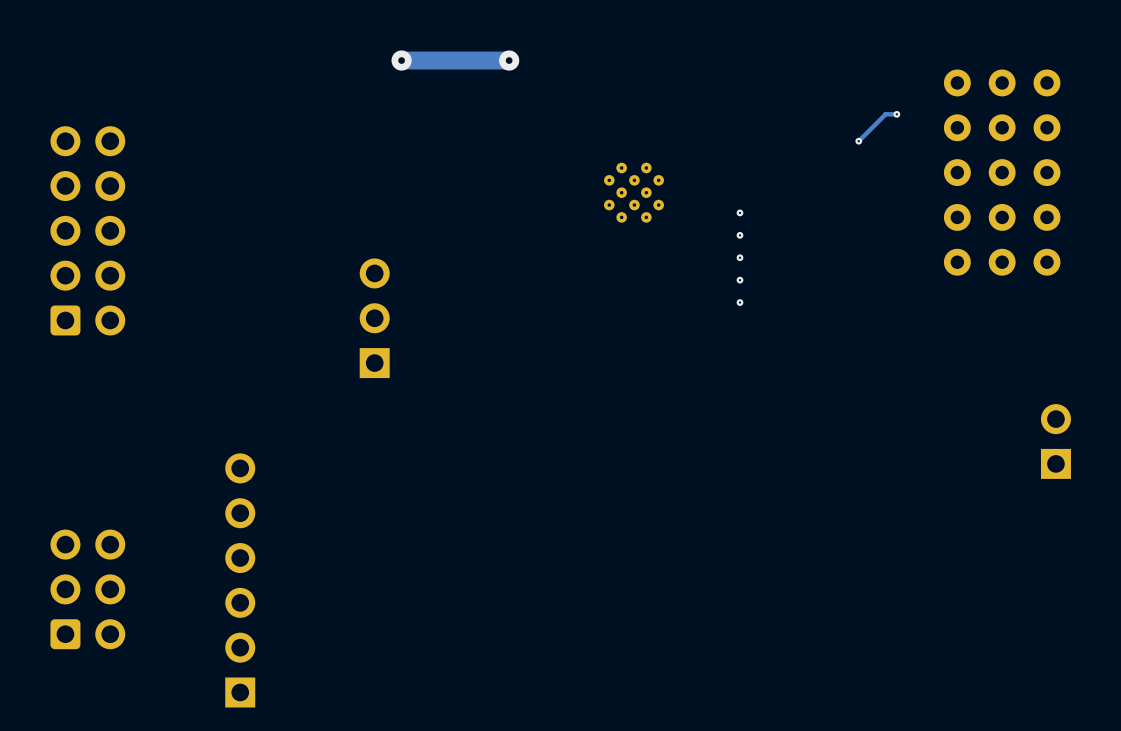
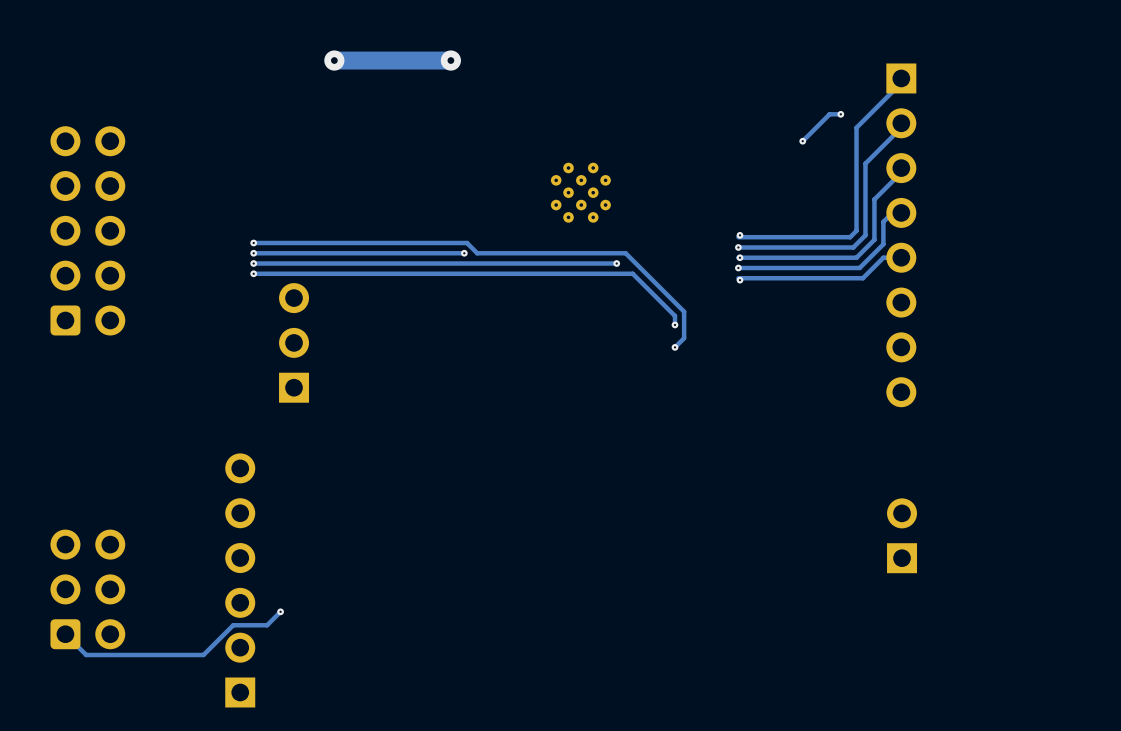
via: none -> (334, 60)
track: none -> (401, 60) (334, 60)
via: (401, 60) -> none
via: none -> (450, 60)
track: (509, 60) (450, 60) -> none
via: (509, 60) -> none
track: none -> (905, 78) (856, 127) (856, 230) (850, 237) (738, 237)
via: none -> (840, 114)
track: (896, 114) (885, 114) (858, 141) -> (840, 114) (829, 114) (802, 141)
via: (896, 114) -> none
track: none -> (905, 123) (865, 163) (865, 235) (853, 247) (738, 247)
via: none -> (802, 141)
via: (858, 141) -> none
track: none -> (905, 168) (874, 199) (874, 239) (856, 257) (738, 257)
part: (1002, 172) -> none
part position: (634, 192) -> (580, 192)
via: (739, 212) -> none
track: none -> (905, 212) (892, 212) (883, 221) (883, 244) (859, 267) (738, 267)
part: none -> (901, 235)
track: none -> (253, 243) (467, 243) (477, 253) (625, 253) (684, 311) (684, 338) (674, 347)
via: none -> (253, 243)
via: none -> (738, 247)
via: none -> (253, 253)
track: none -> (464, 253) (253, 253)
via: none -> (464, 253)
track: none -> (905, 257) (883, 257) (862, 278) (738, 278)
via: none -> (253, 263)
track: none -> (616, 263) (253, 263)
via: none -> (616, 263)
via: none -> (738, 267)
track: none -> (253, 273) (632, 273) (674, 316) (674, 324)
via: none -> (253, 273)
via: (739, 302) -> none
part position: (374, 318) -> (294, 342)
via: none -> (674, 324)
via: none -> (674, 347)
part position: (1055, 441) -> (902, 535)
track: none -> (280, 611) (267, 625) (233, 625) (203, 654) (86, 654) (65, 634)
via: none -> (280, 611)

